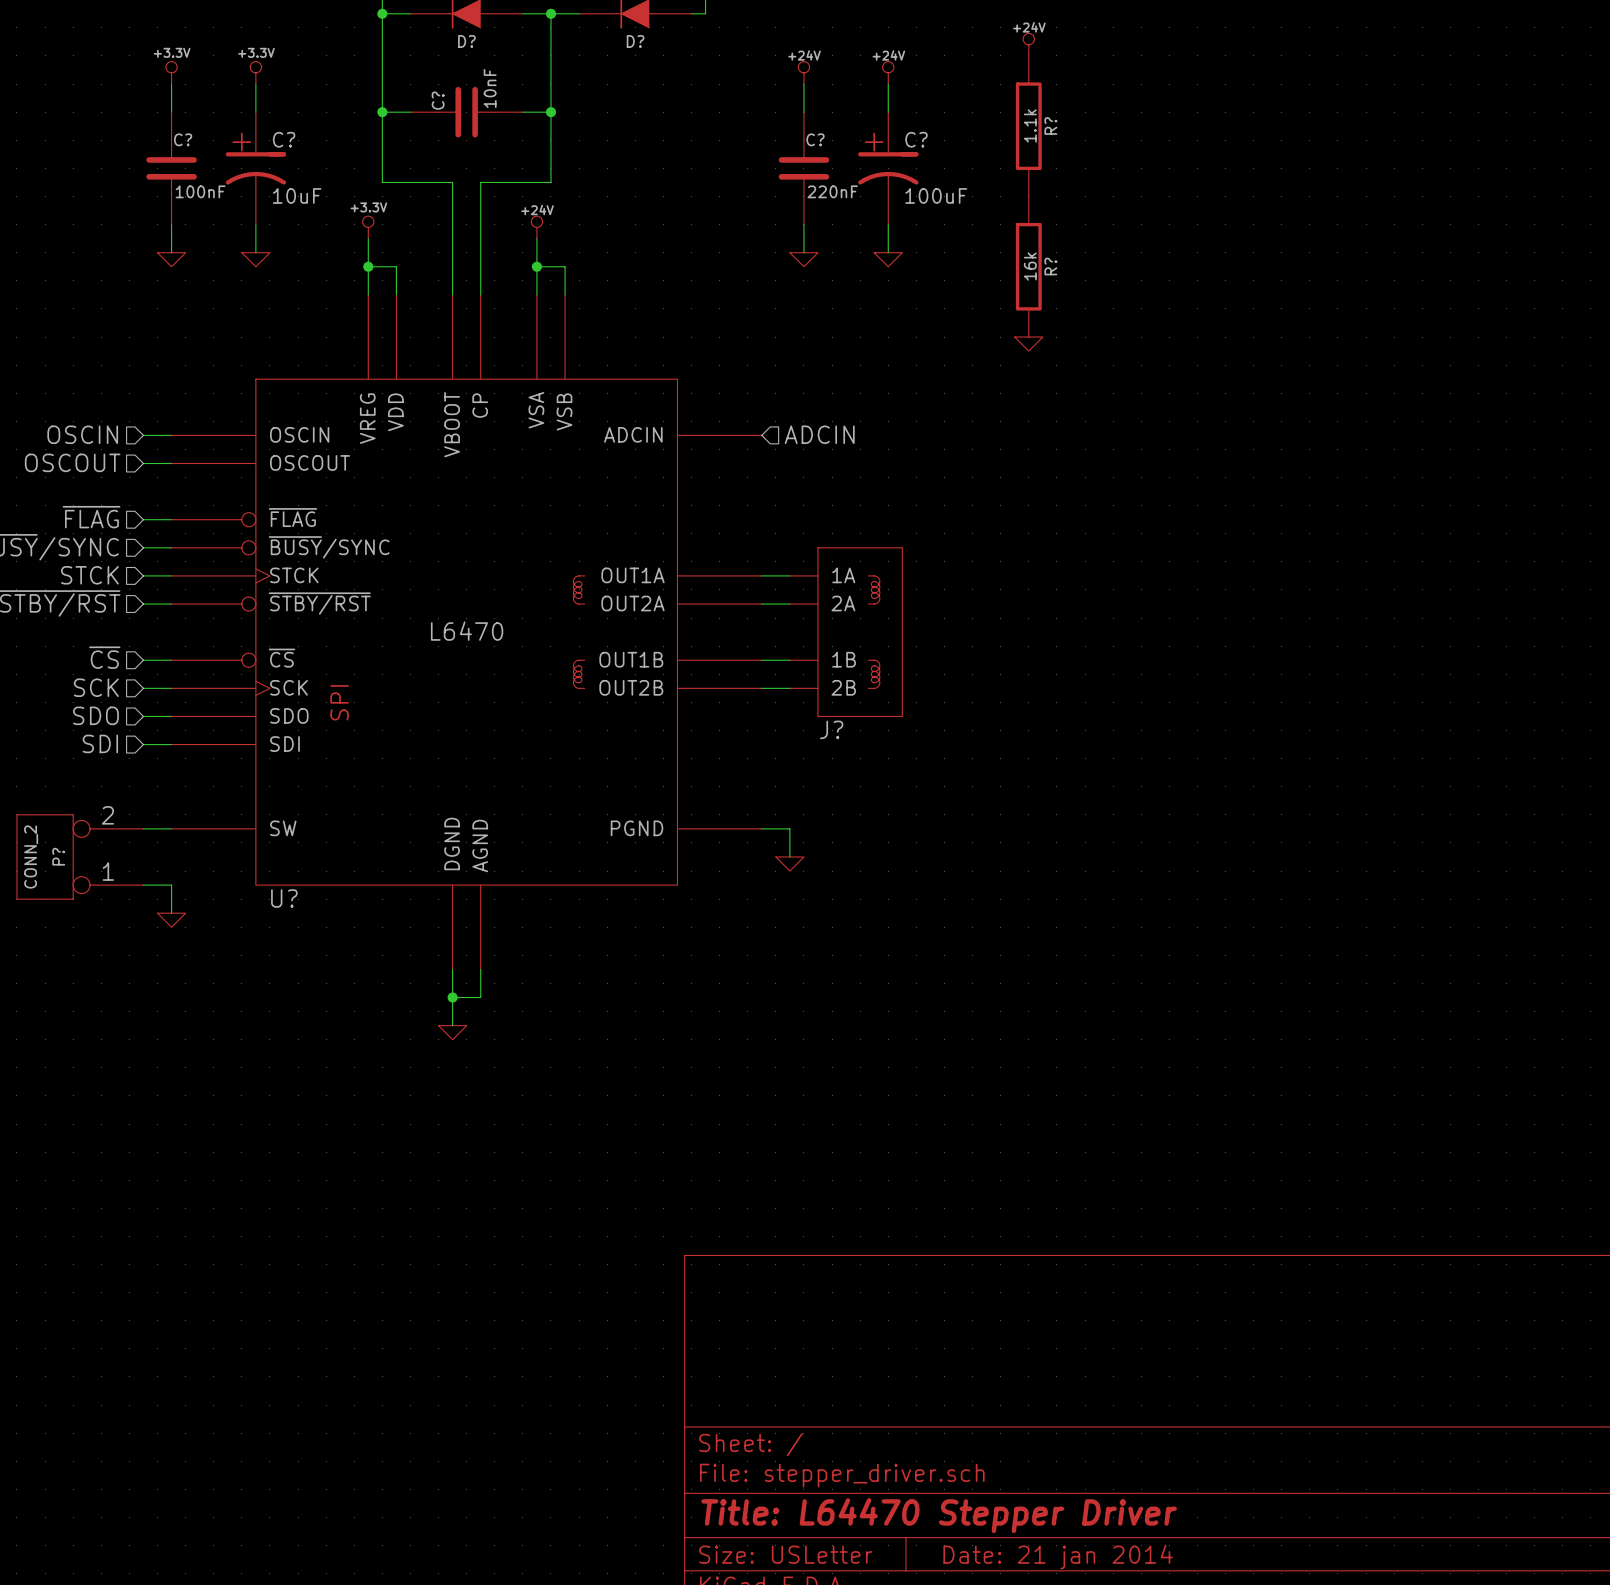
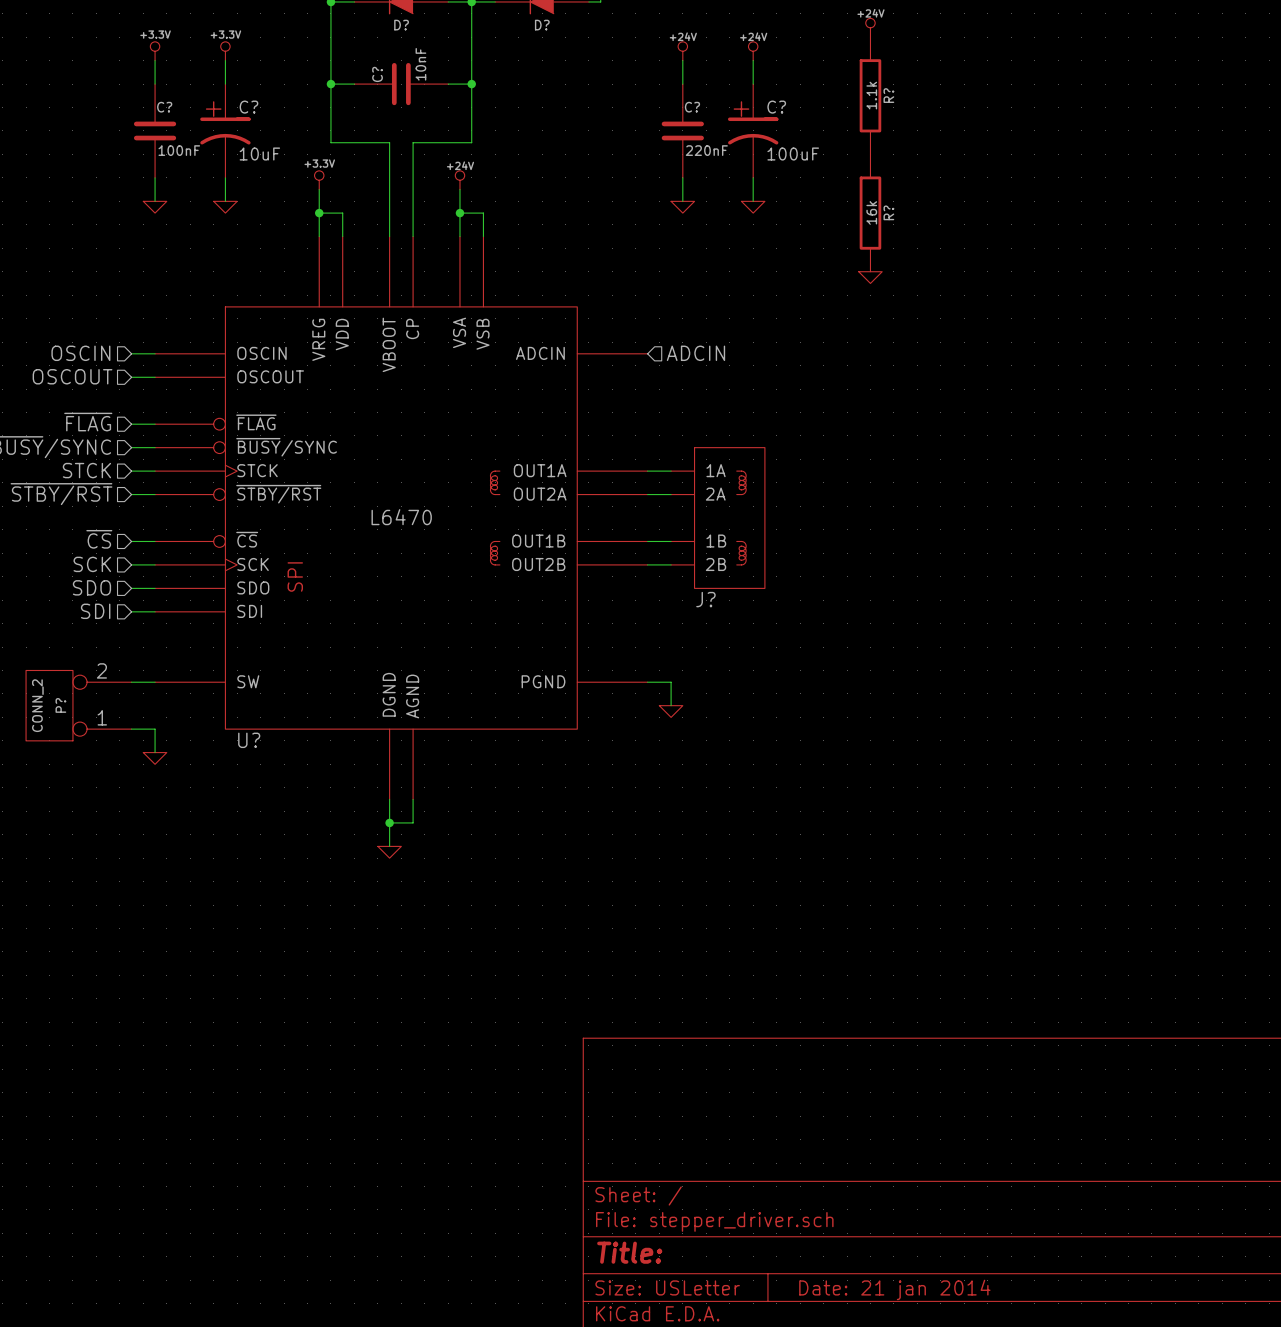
title block: Title: L64470 Stepper Driver (939, 1515) -> Title: (629, 1252)

